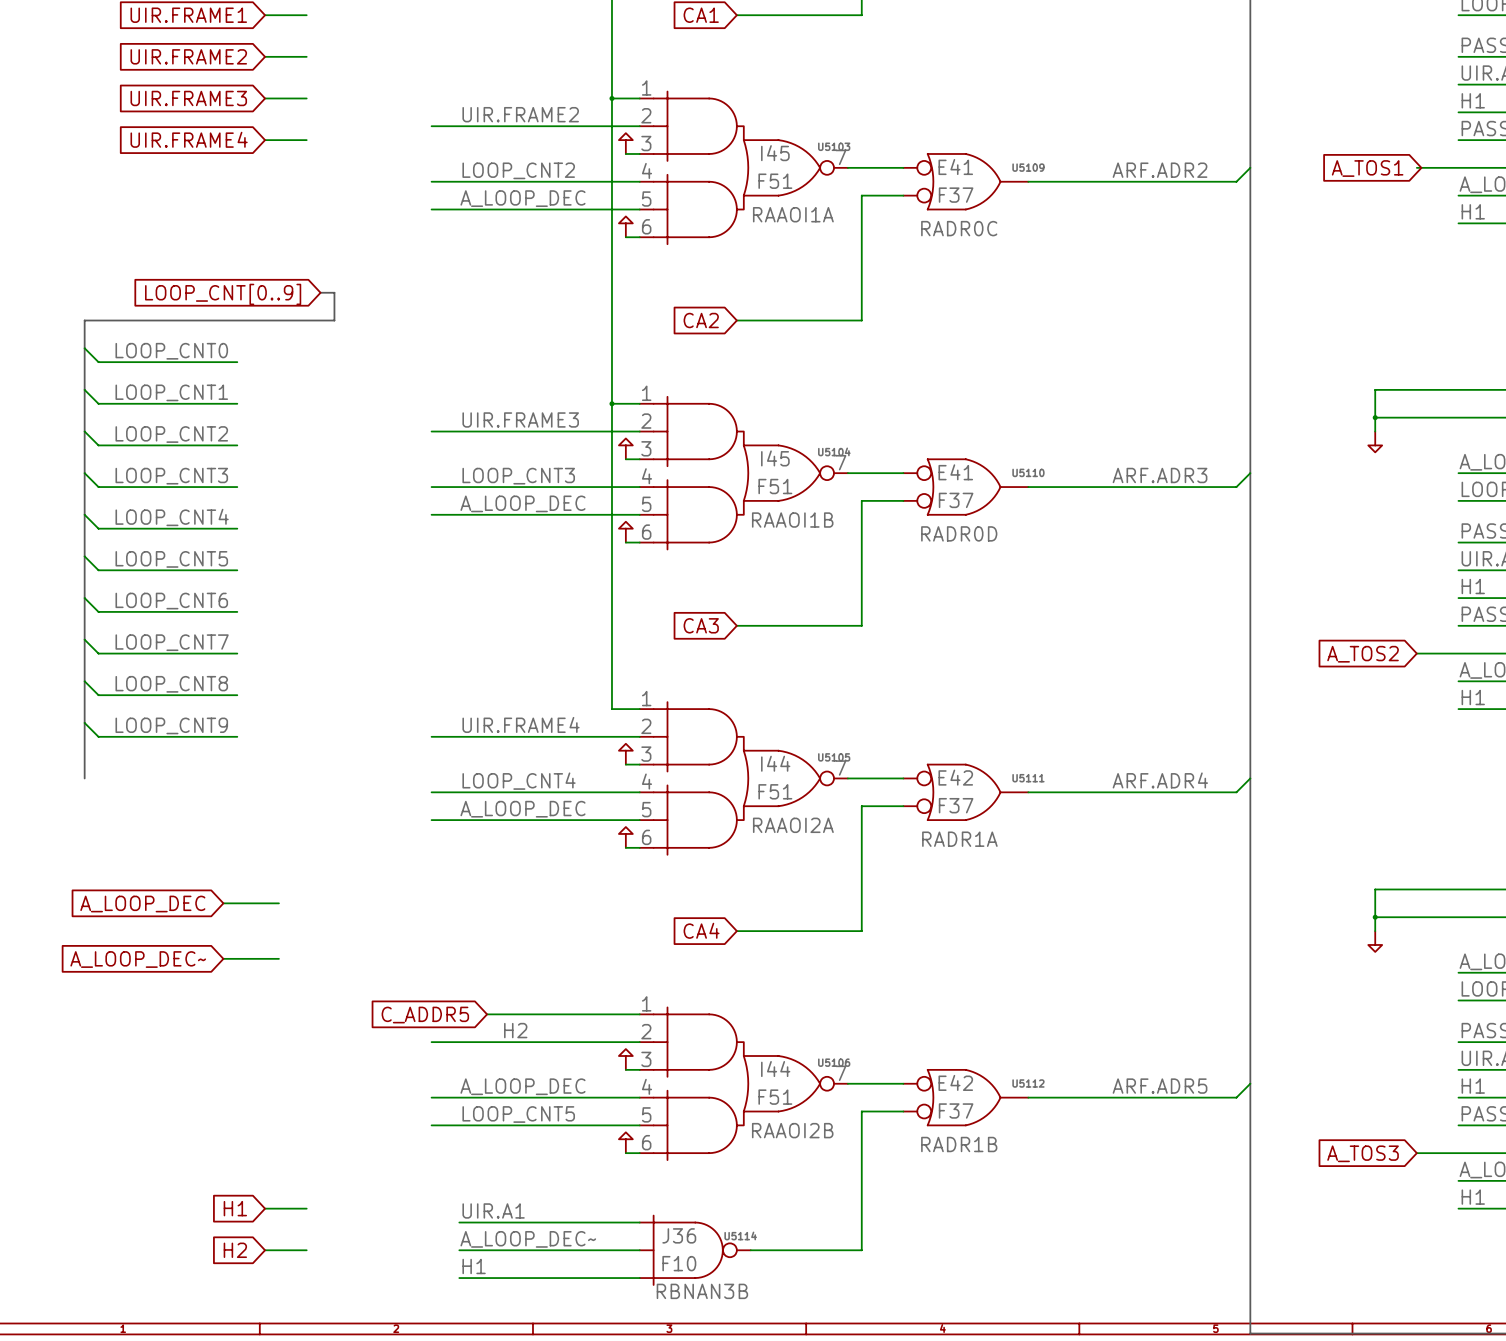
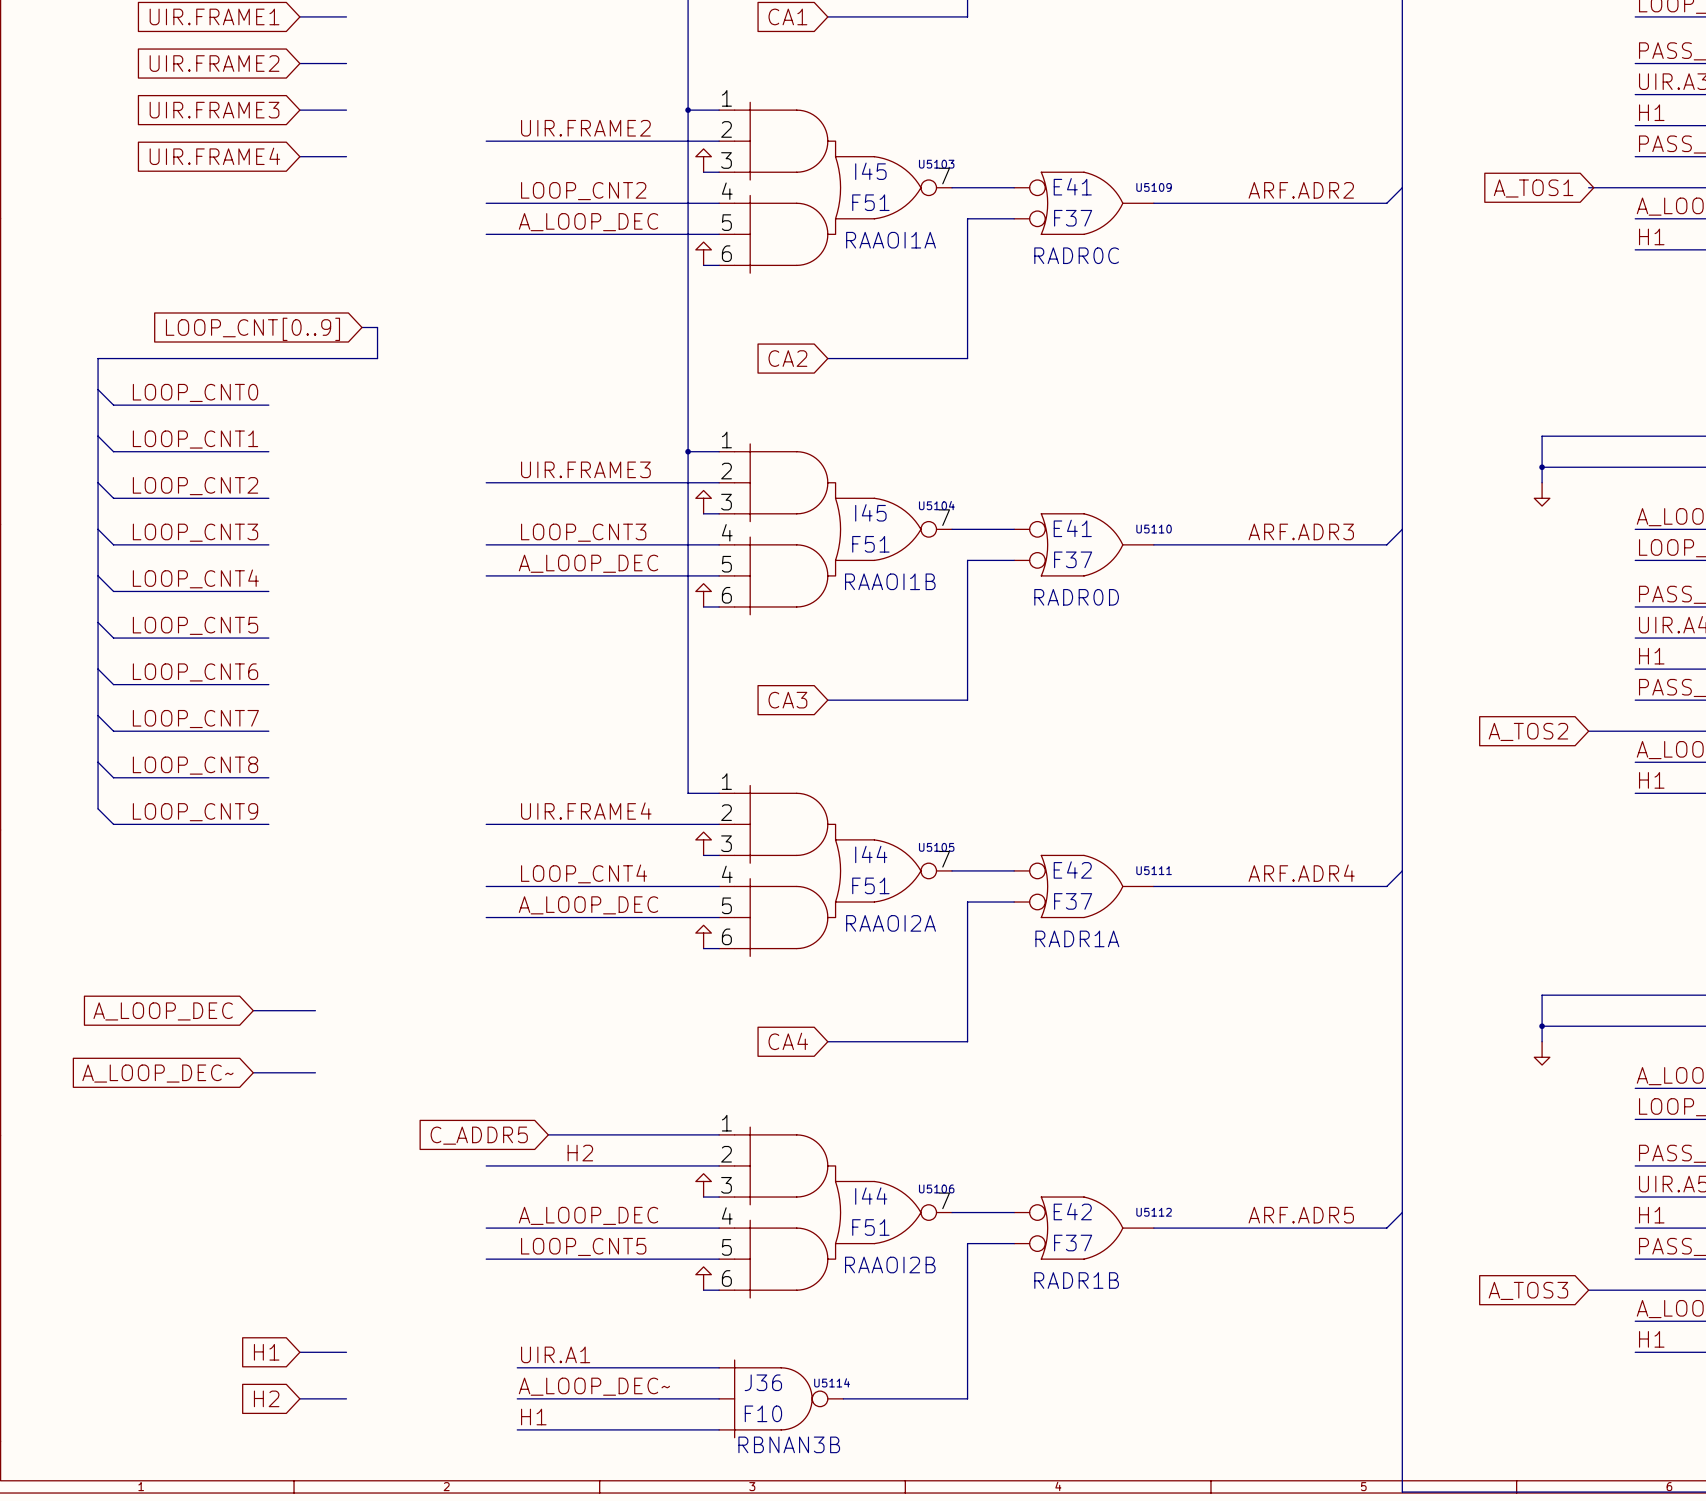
bus: (84, 722) (84, 778) -> none

